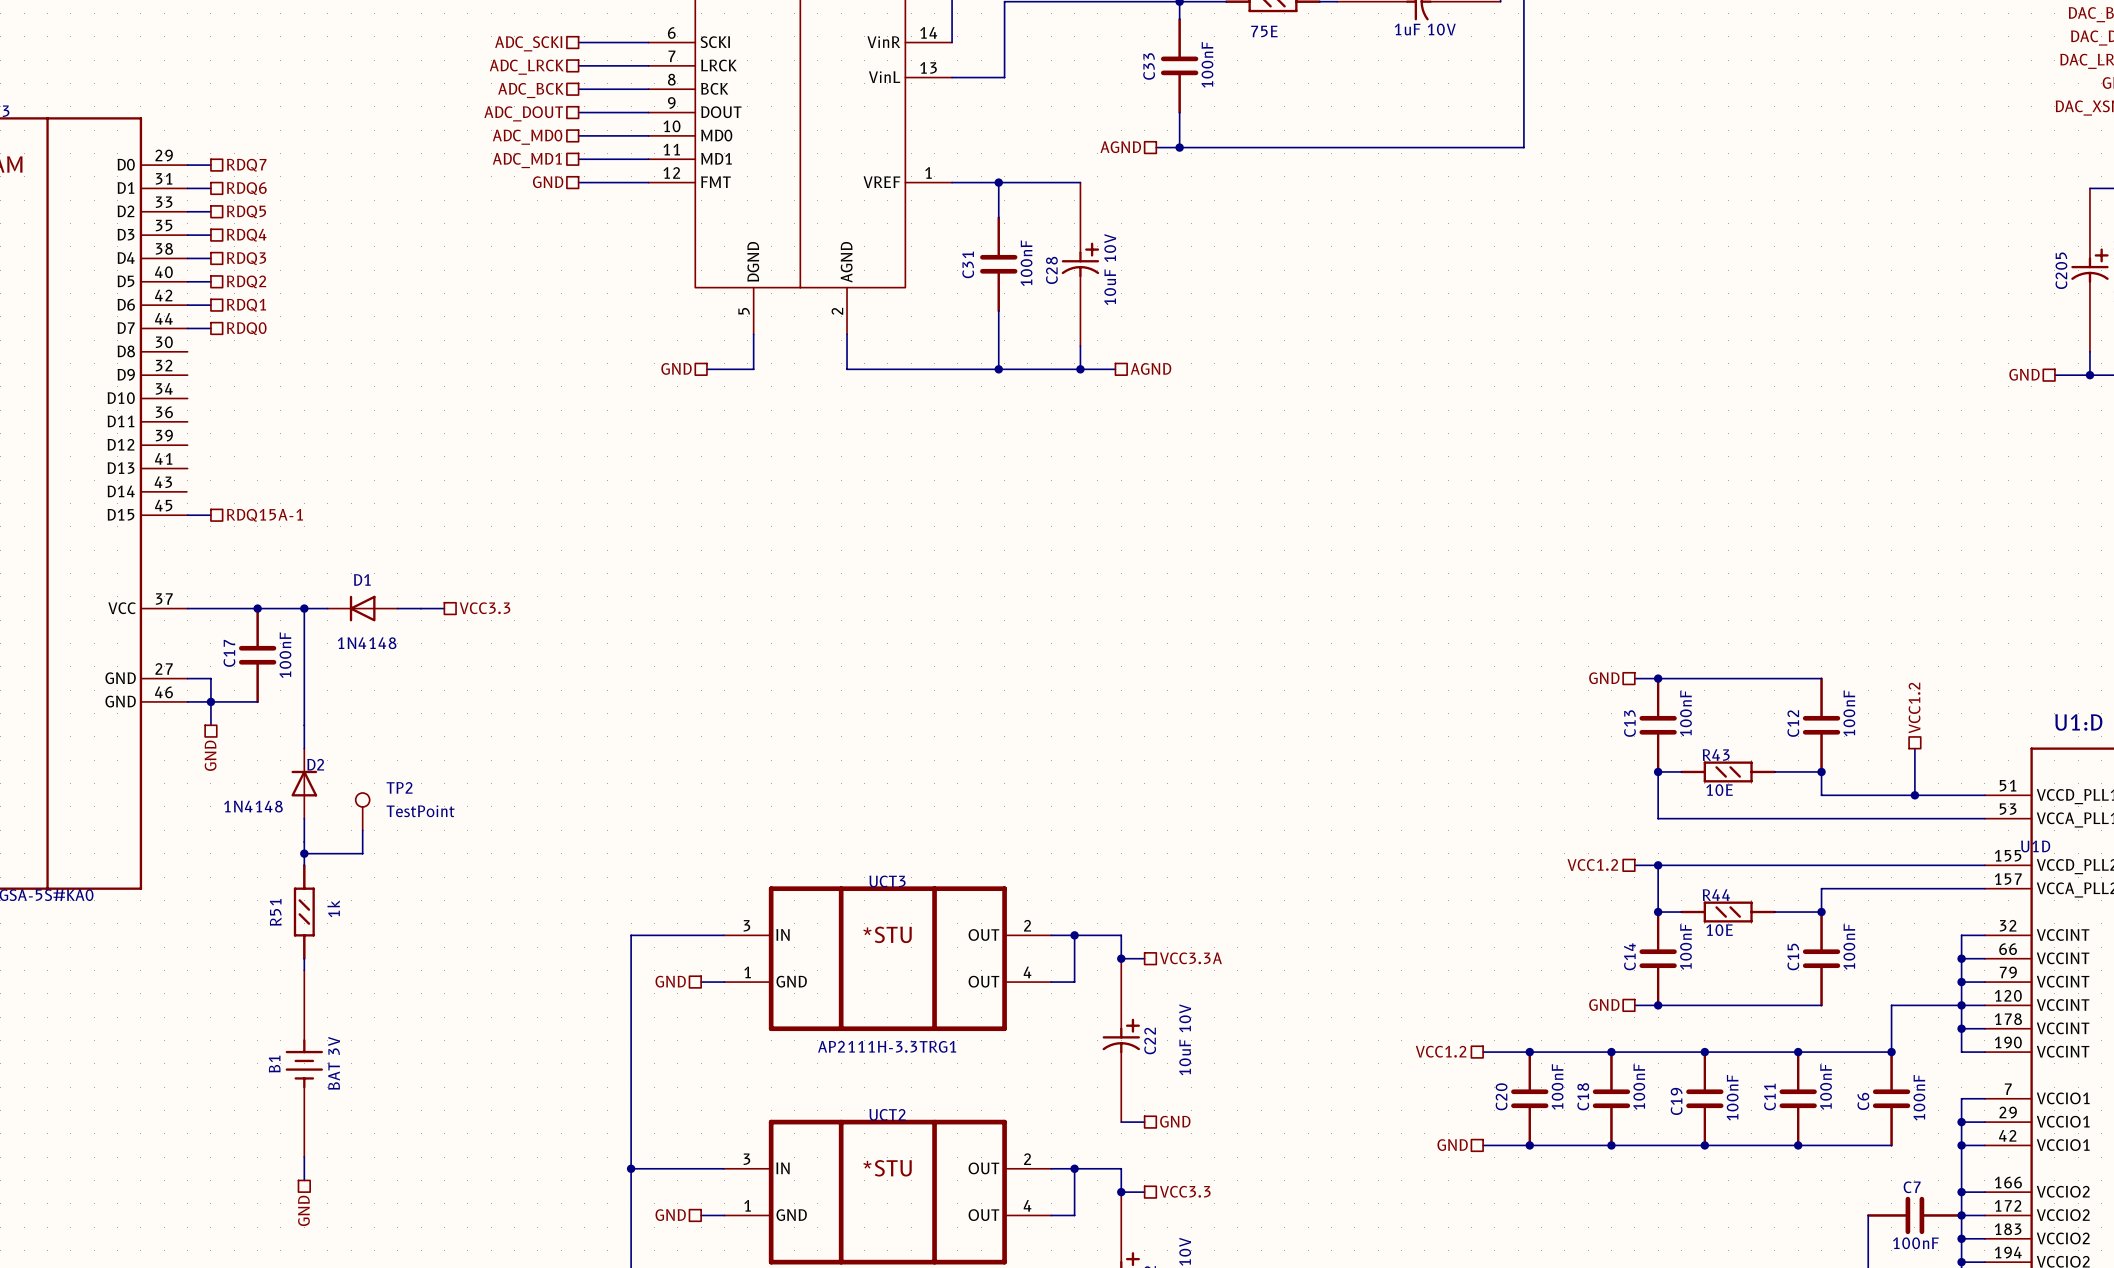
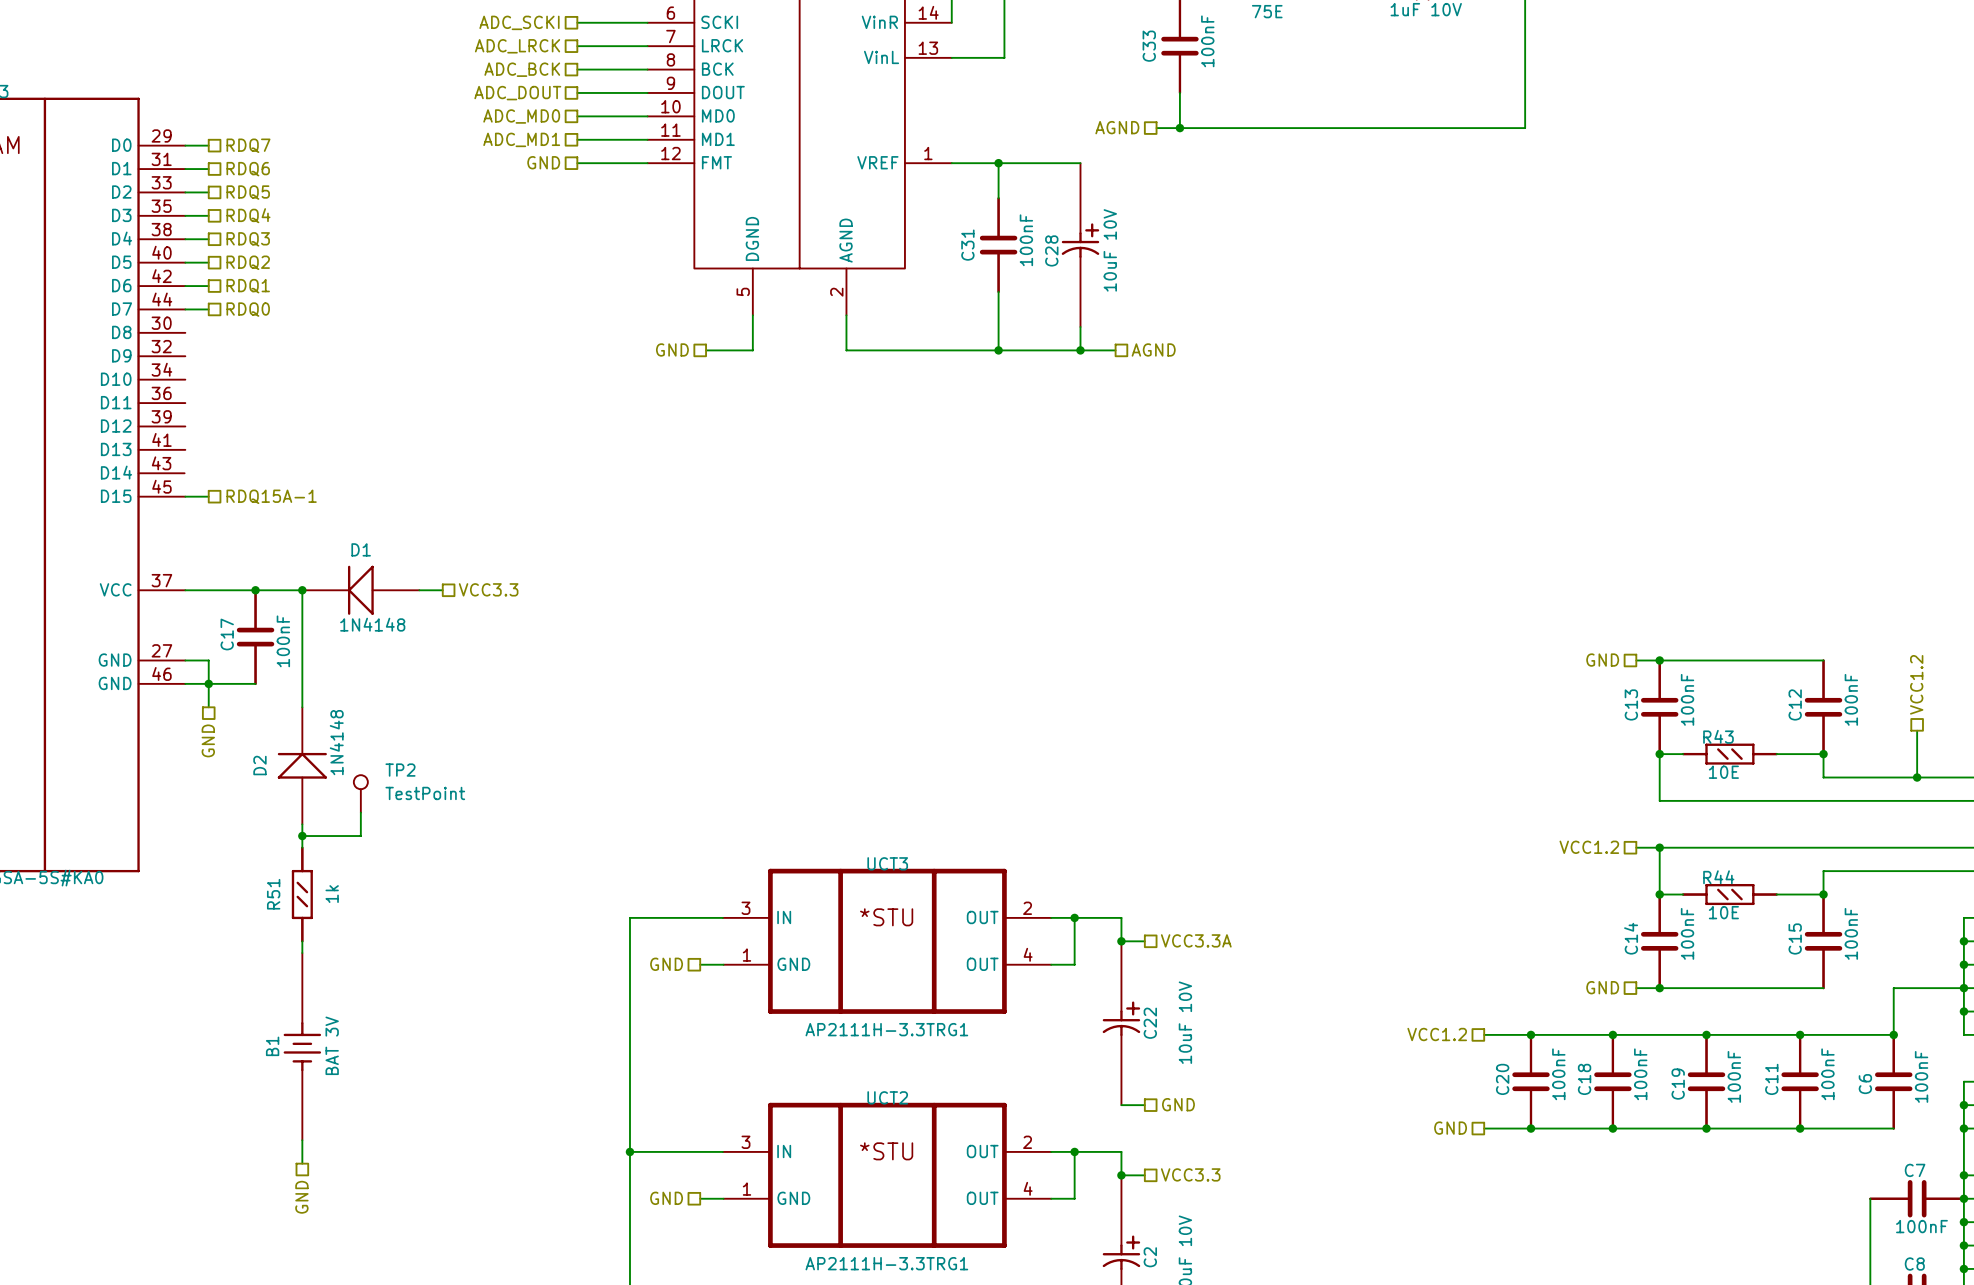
D1 symbol: [327, 595, 398, 622] -> [302, 565, 420, 615]
D2 symbol: [291, 748, 318, 819] -> [277, 707, 327, 825]
D2 name position: D2 (315, 764) -> D2 (259, 765)
D2 value position: 1N4148 (253, 806) -> 1N4148 (336, 742)

